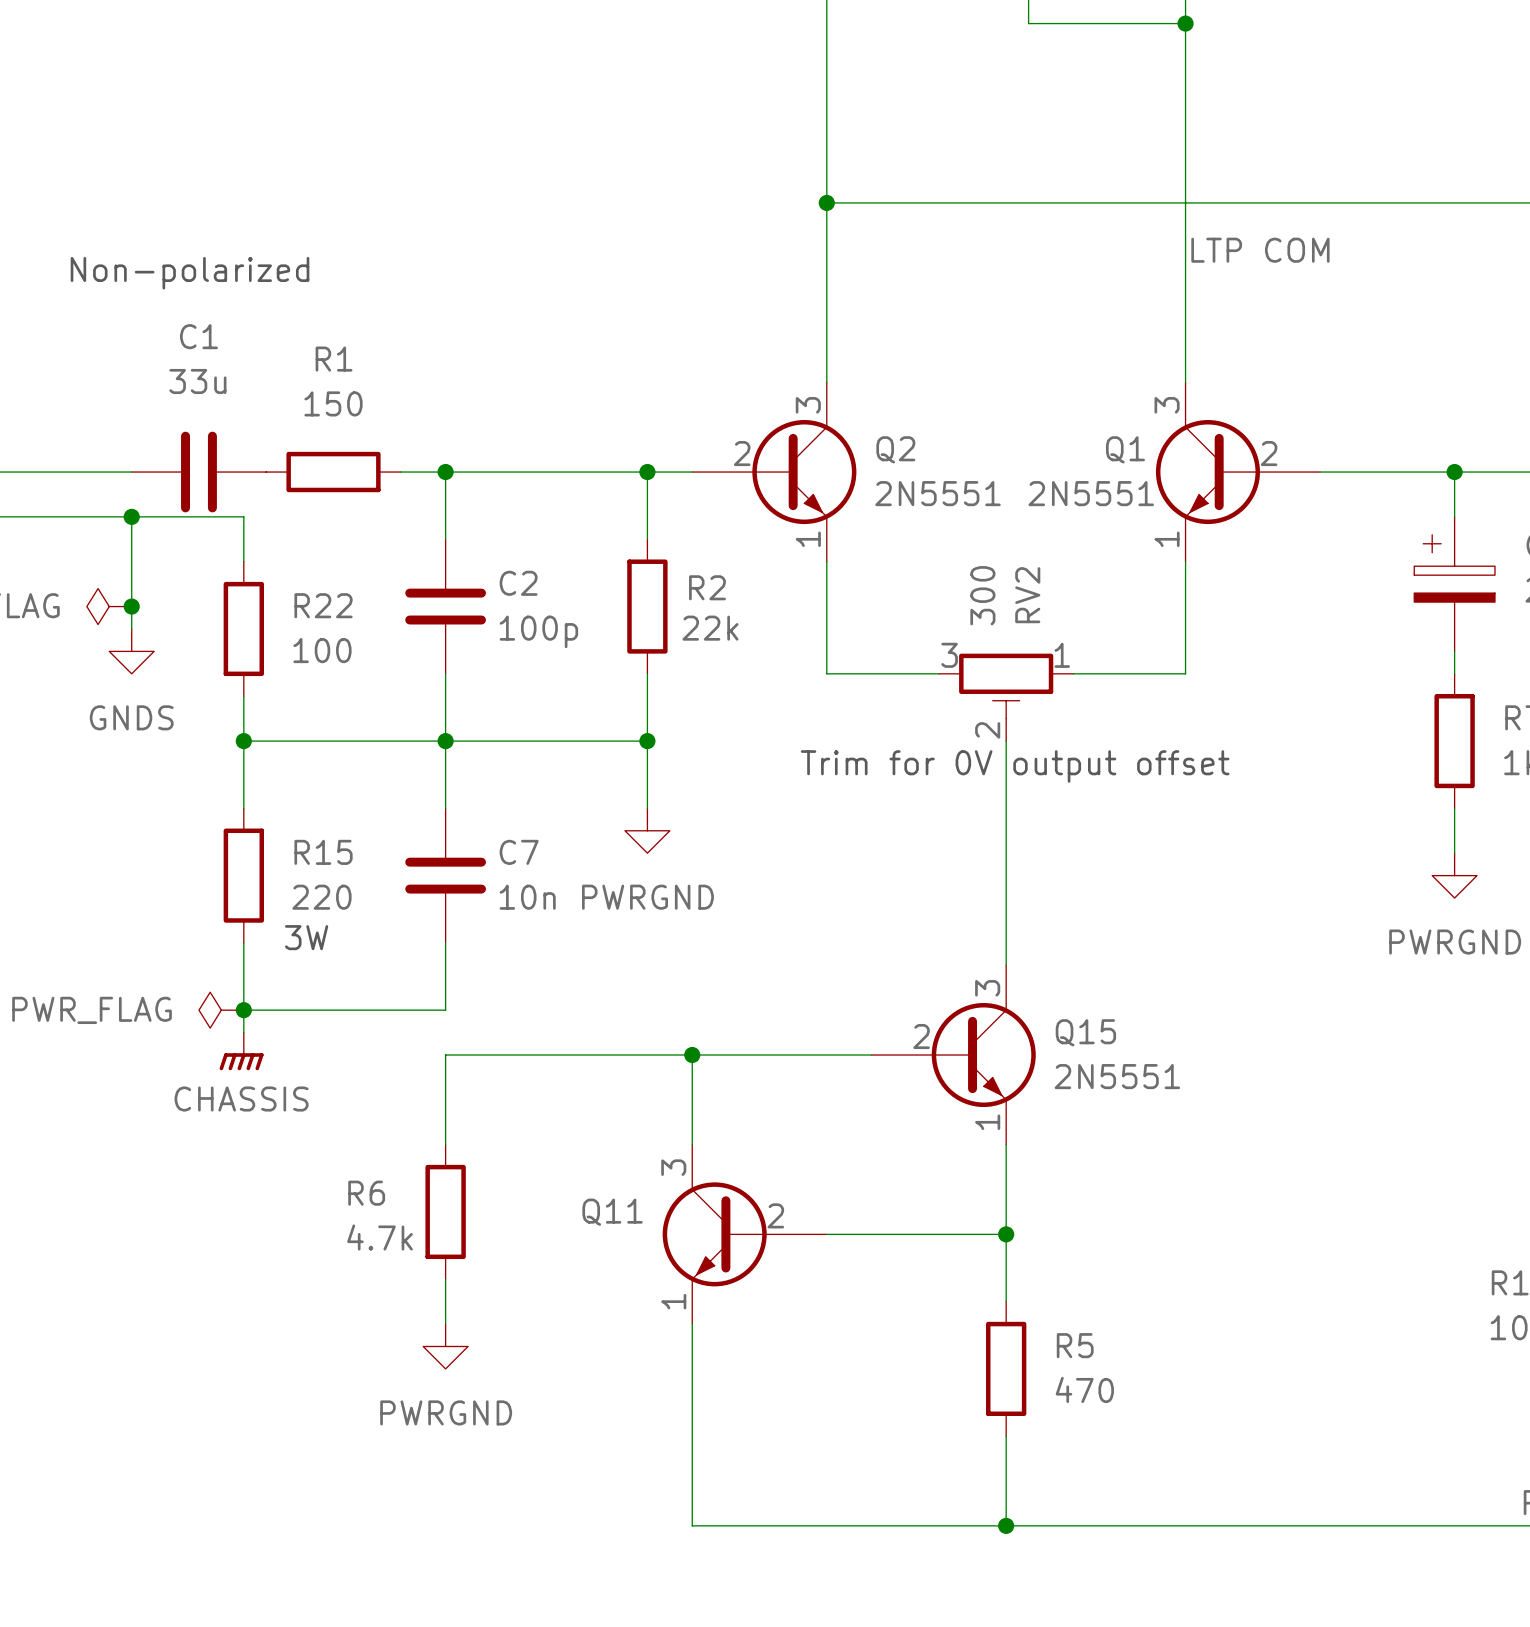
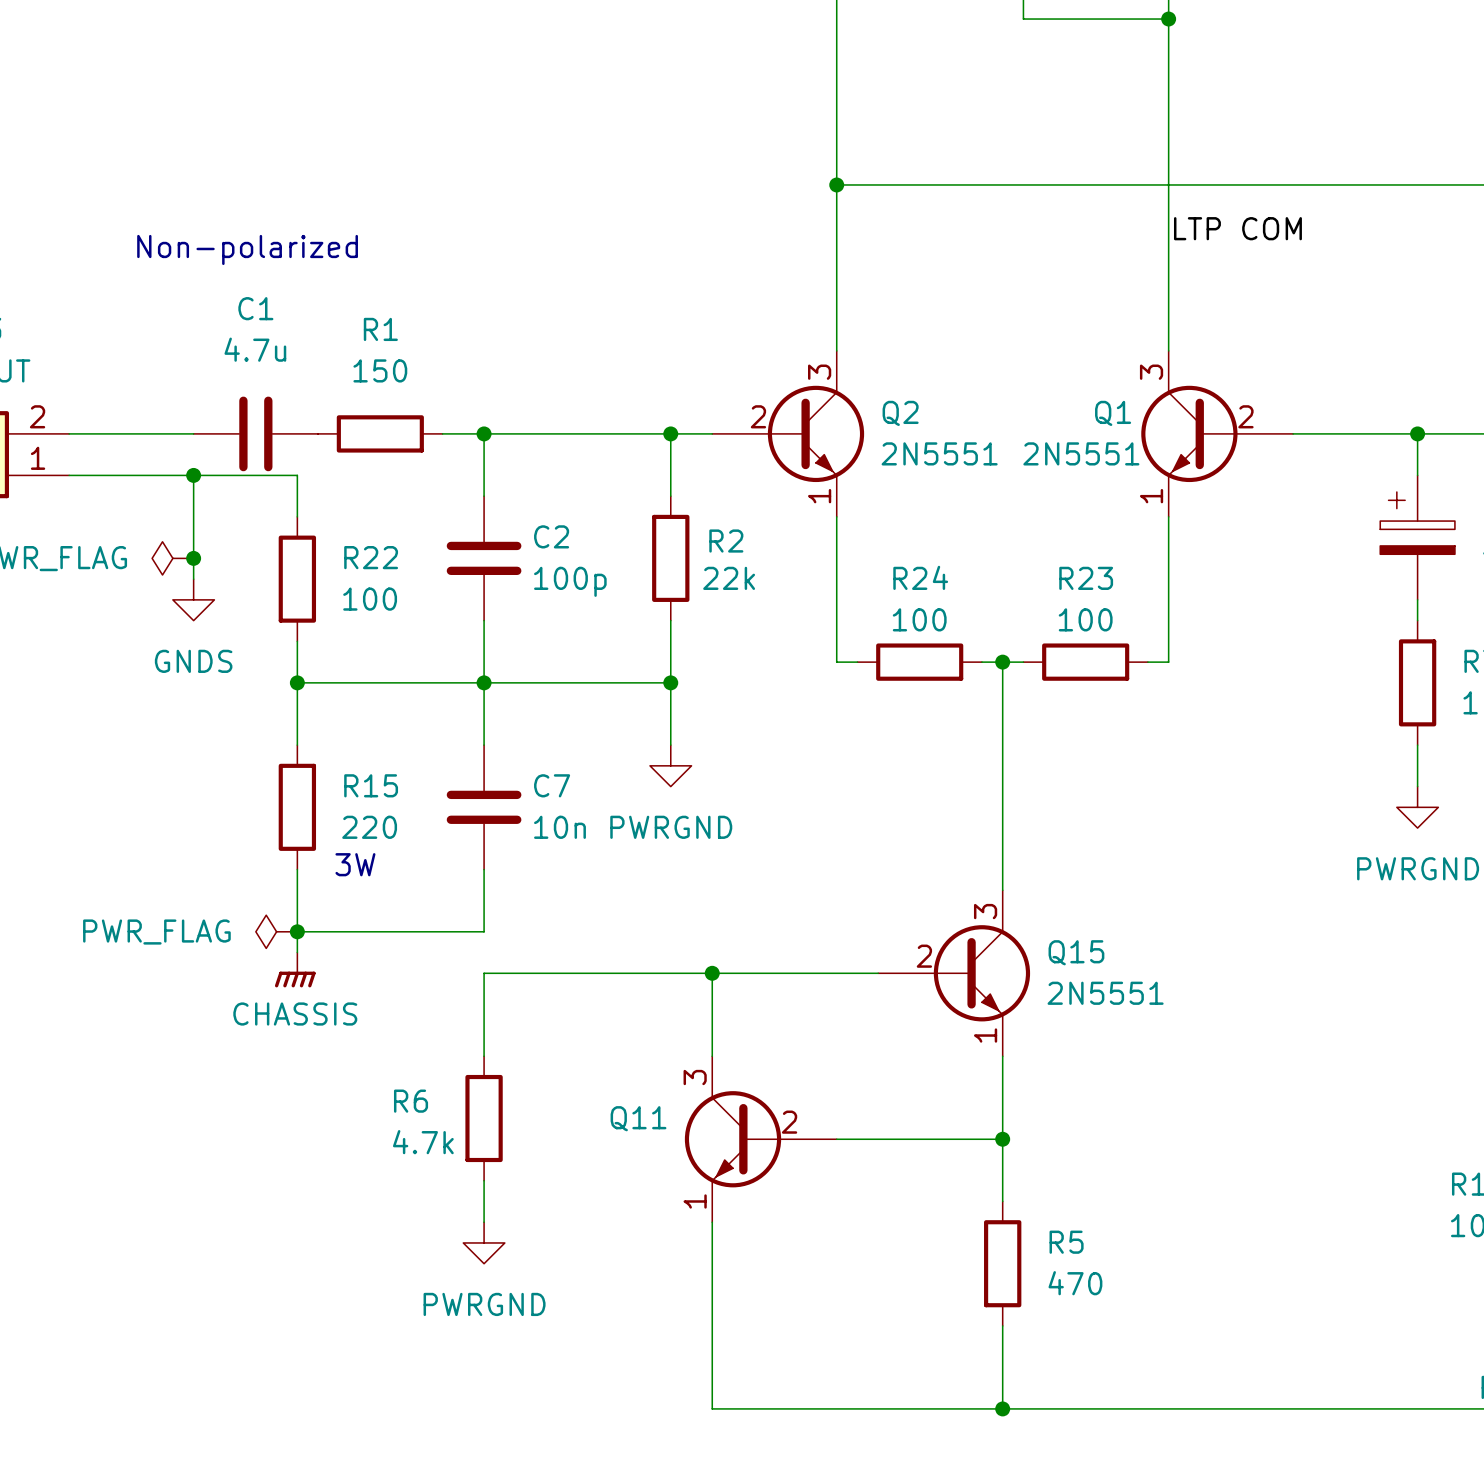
C1 value: 33u (197, 381) -> 4.7u (255, 349)
wire: (826, 673) (938, 673) -> (836, 620) (836, 662) (857, 662)
wire: (1073, 673) (1185, 673) -> (1147, 662) (1168, 662) (1168, 620)
RV2: 300 (1006, 697) -> none
R24: none -> 100 (919, 662)
wire: none -> (981, 662) (1023, 662)
junction: none -> (1002, 662)
R23: none -> 100 (1085, 662)
text: Trim for 0V output offset (1015, 766) -> none

